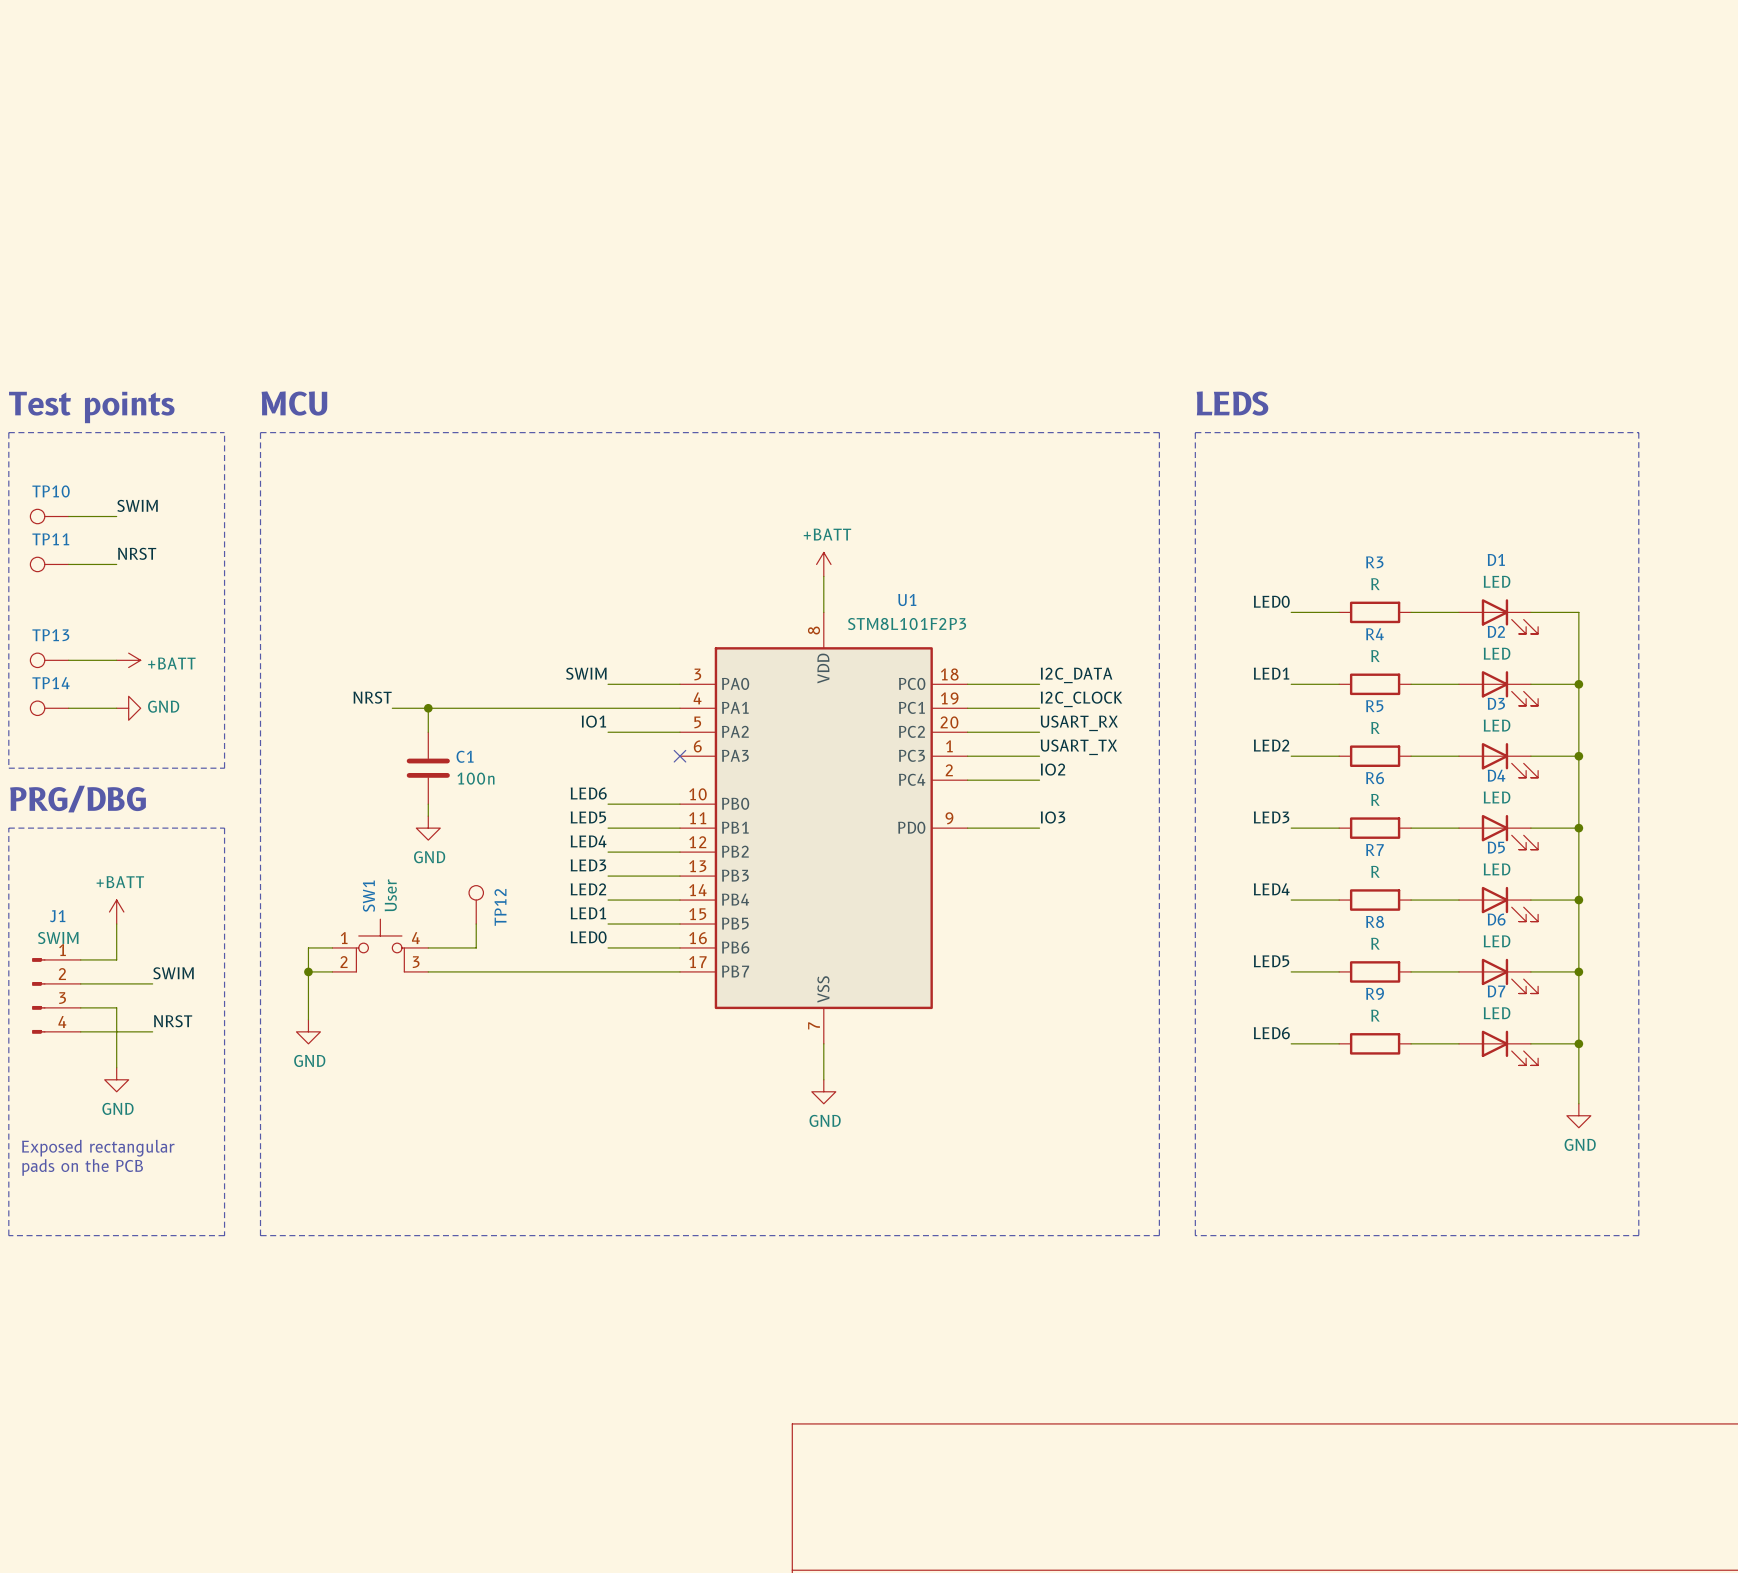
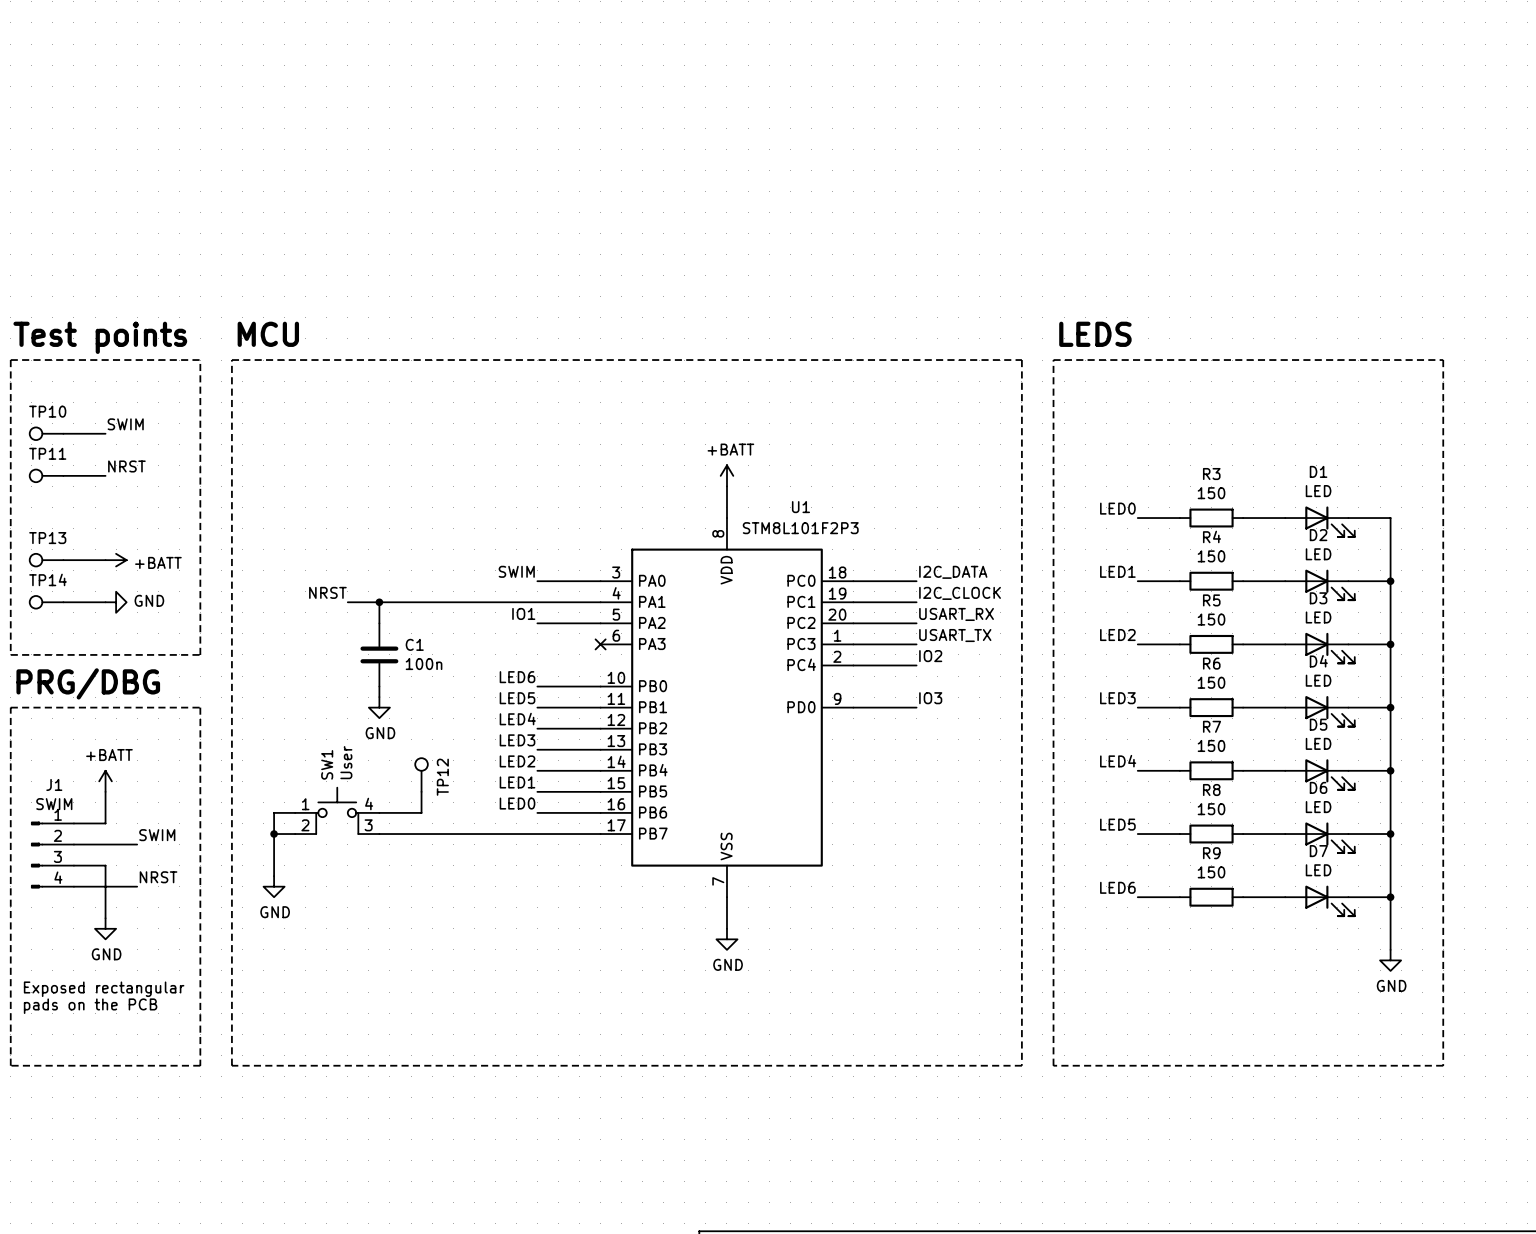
R3 value: R (1375, 584) -> 150 (1211, 493)
R4 value: R (1375, 656) -> 150 (1211, 556)
R5 value: R (1375, 727) -> 150 (1211, 619)
R6 value: R (1375, 799) -> 150 (1211, 682)
R7 value: R (1375, 871) -> 150 (1211, 745)
R8 value: R (1375, 943) -> 150 (1211, 809)
R9 value: R (1375, 1015) -> 150 (1211, 872)

